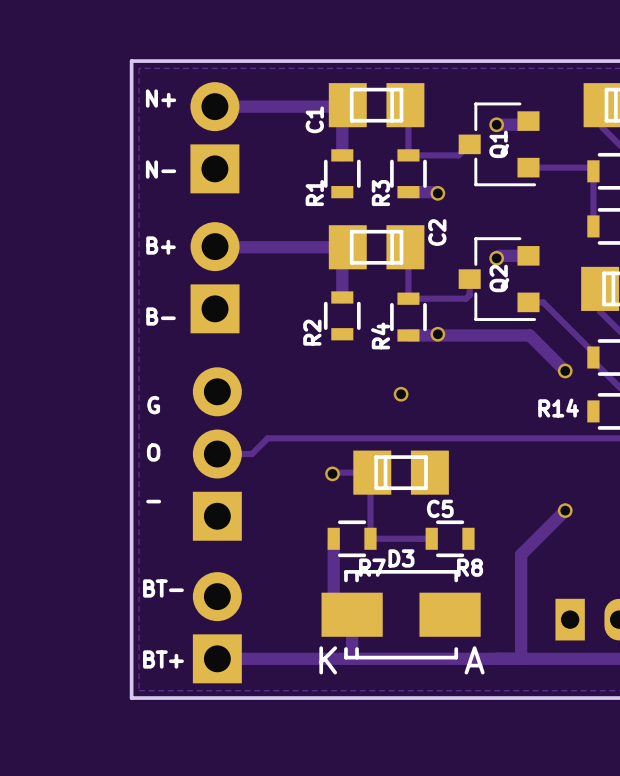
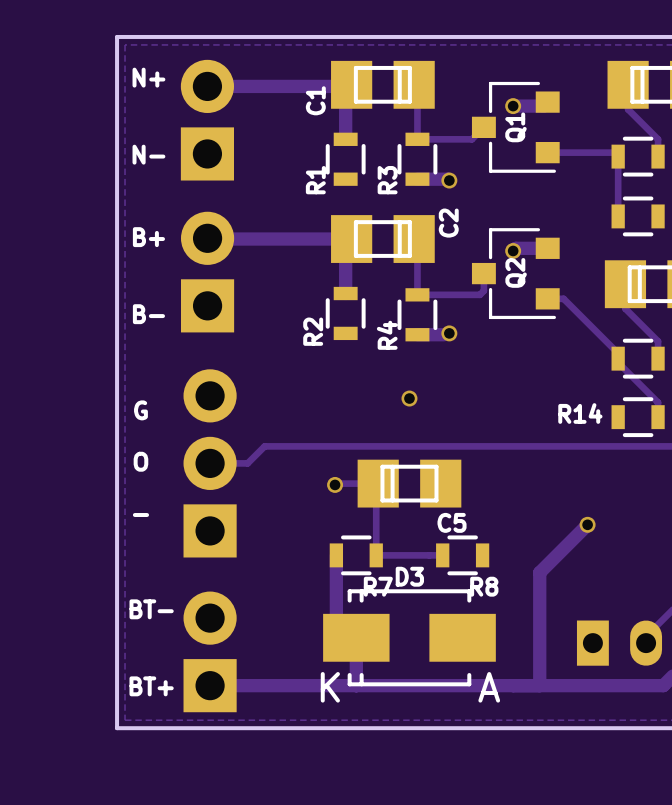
track: (432, 335) (529, 335) (565, 370) -> none
via: (565, 370) -> none

